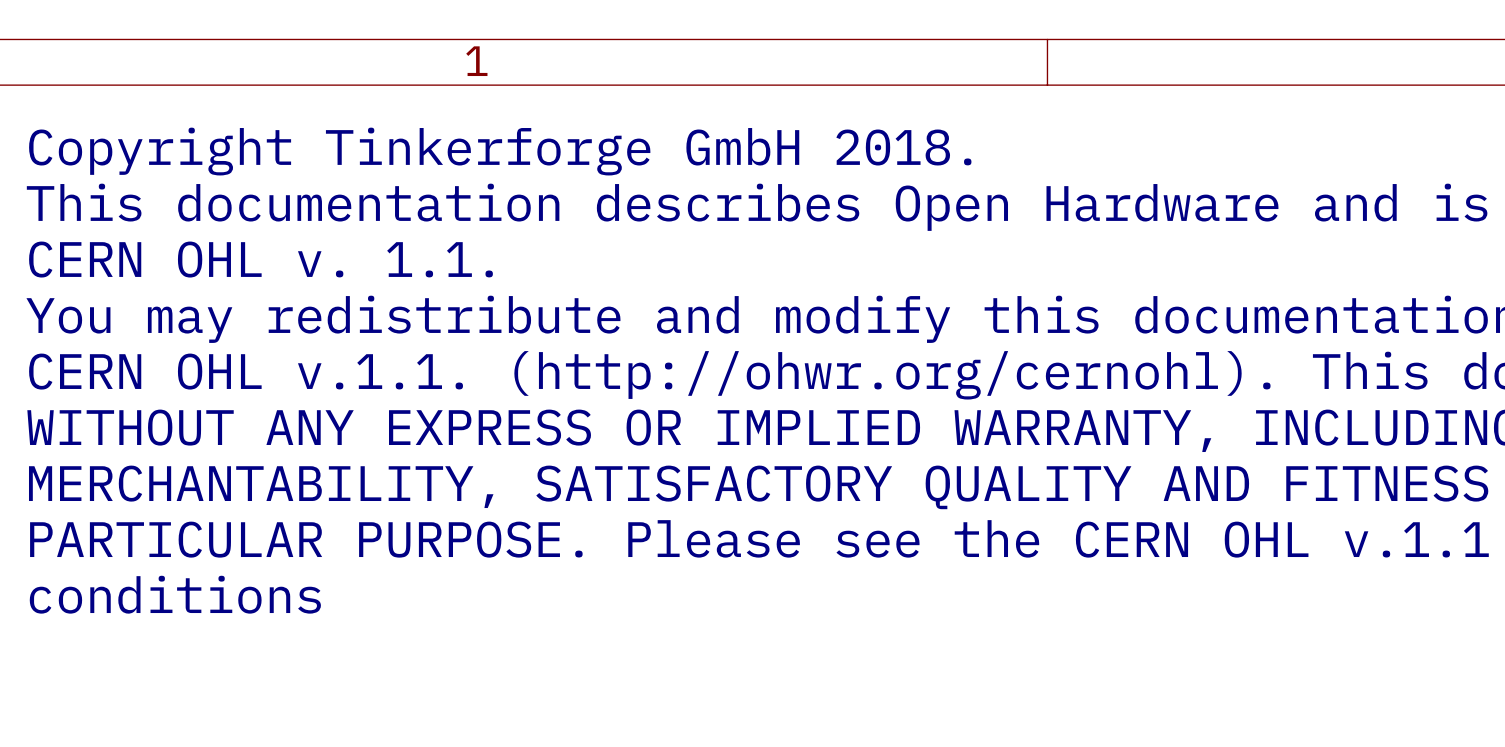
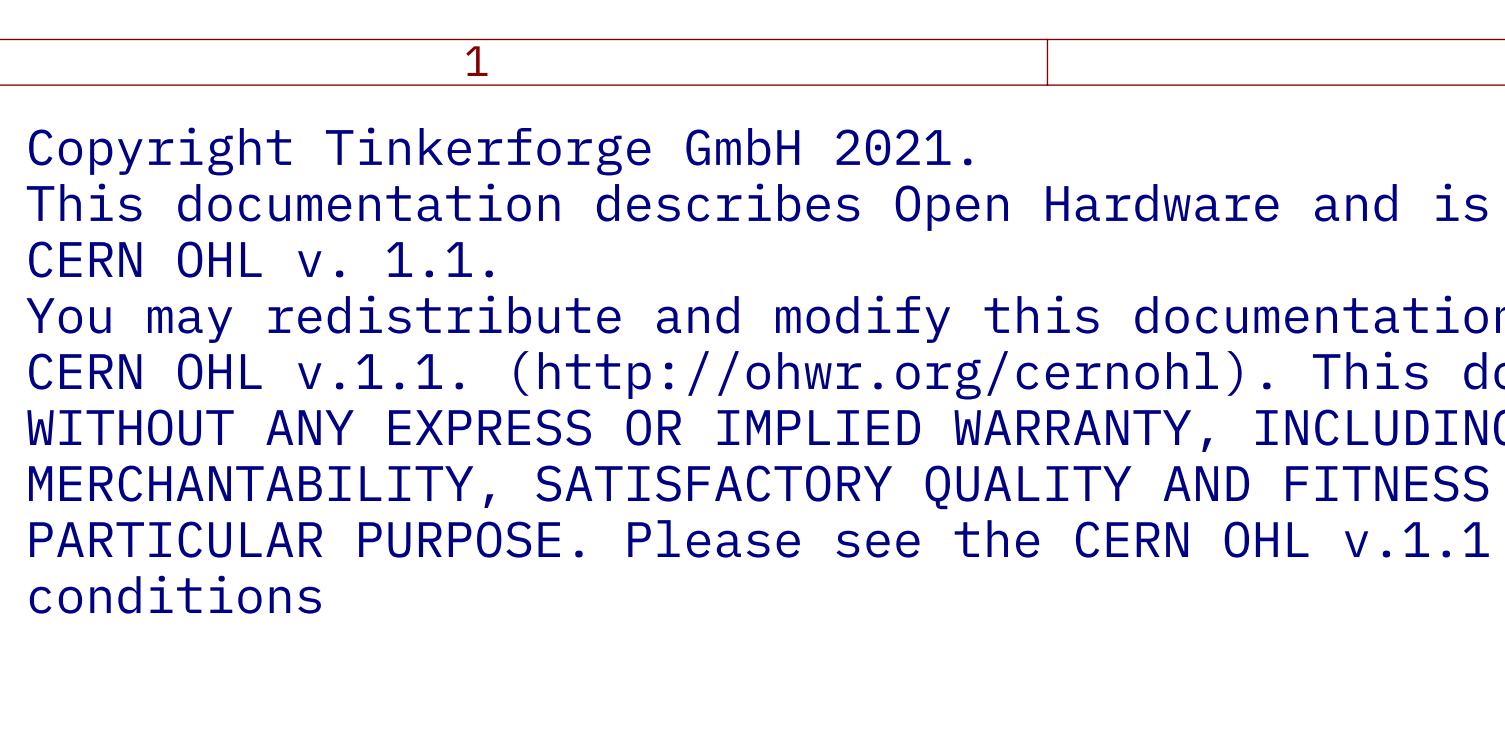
text: Copyright Tinkerforge GmbH 2018. (500, 151) -> Copyright Tinkerforge GmbH 2021. (500, 151)

